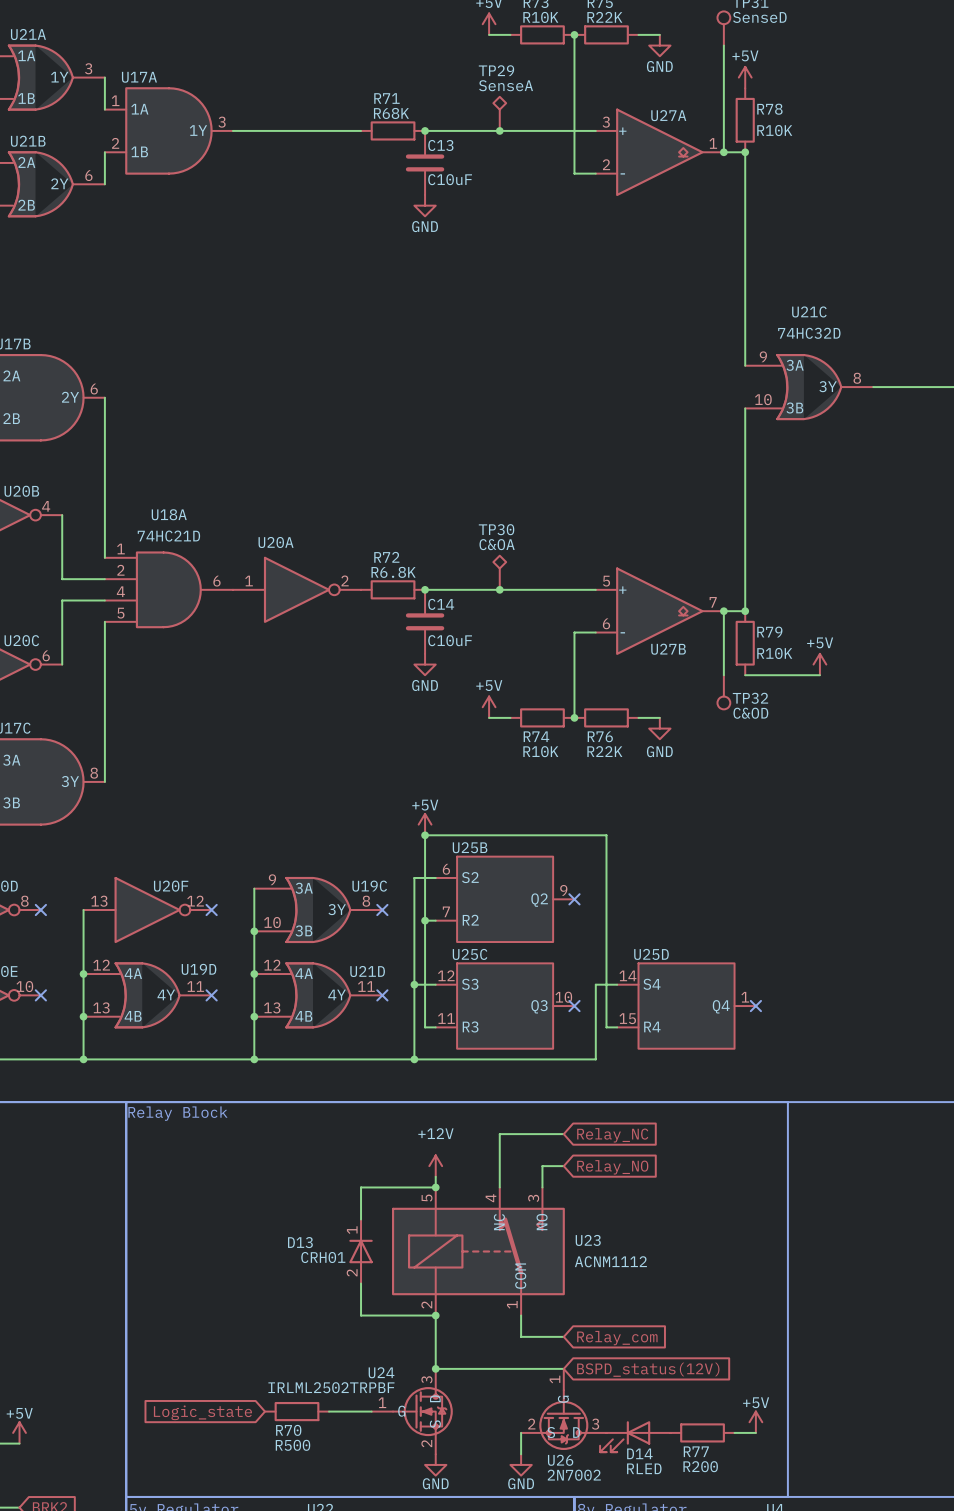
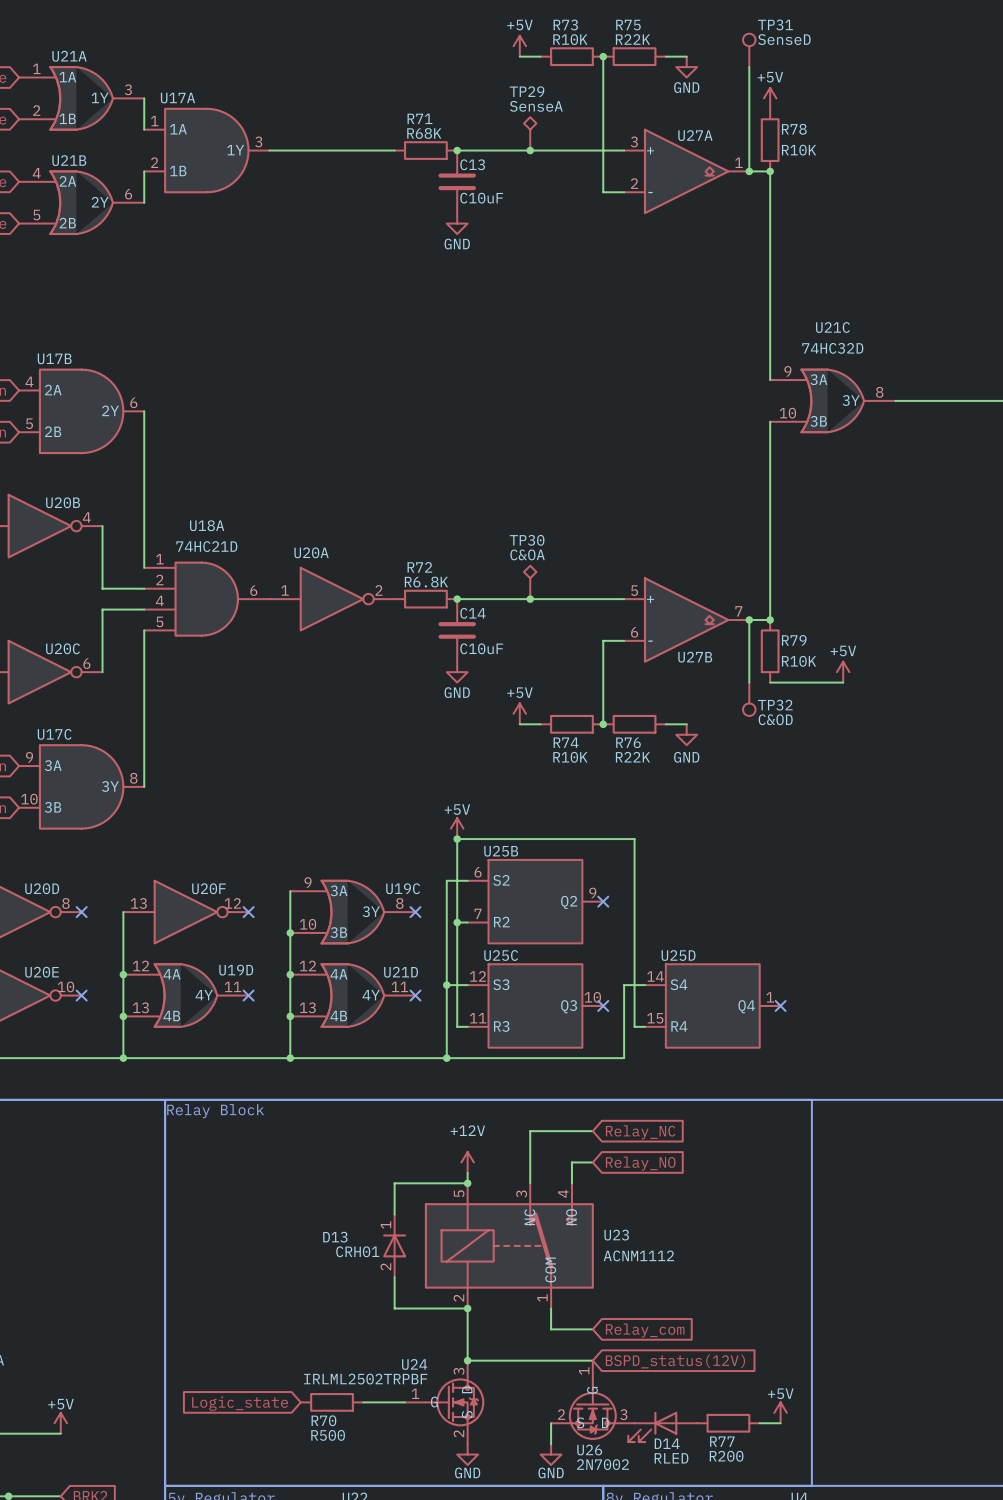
U23 pin number: 4 (490, 1198) -> 3 (521, 1194)
U23 pin number: 3 (533, 1198) -> 4 (563, 1193)

